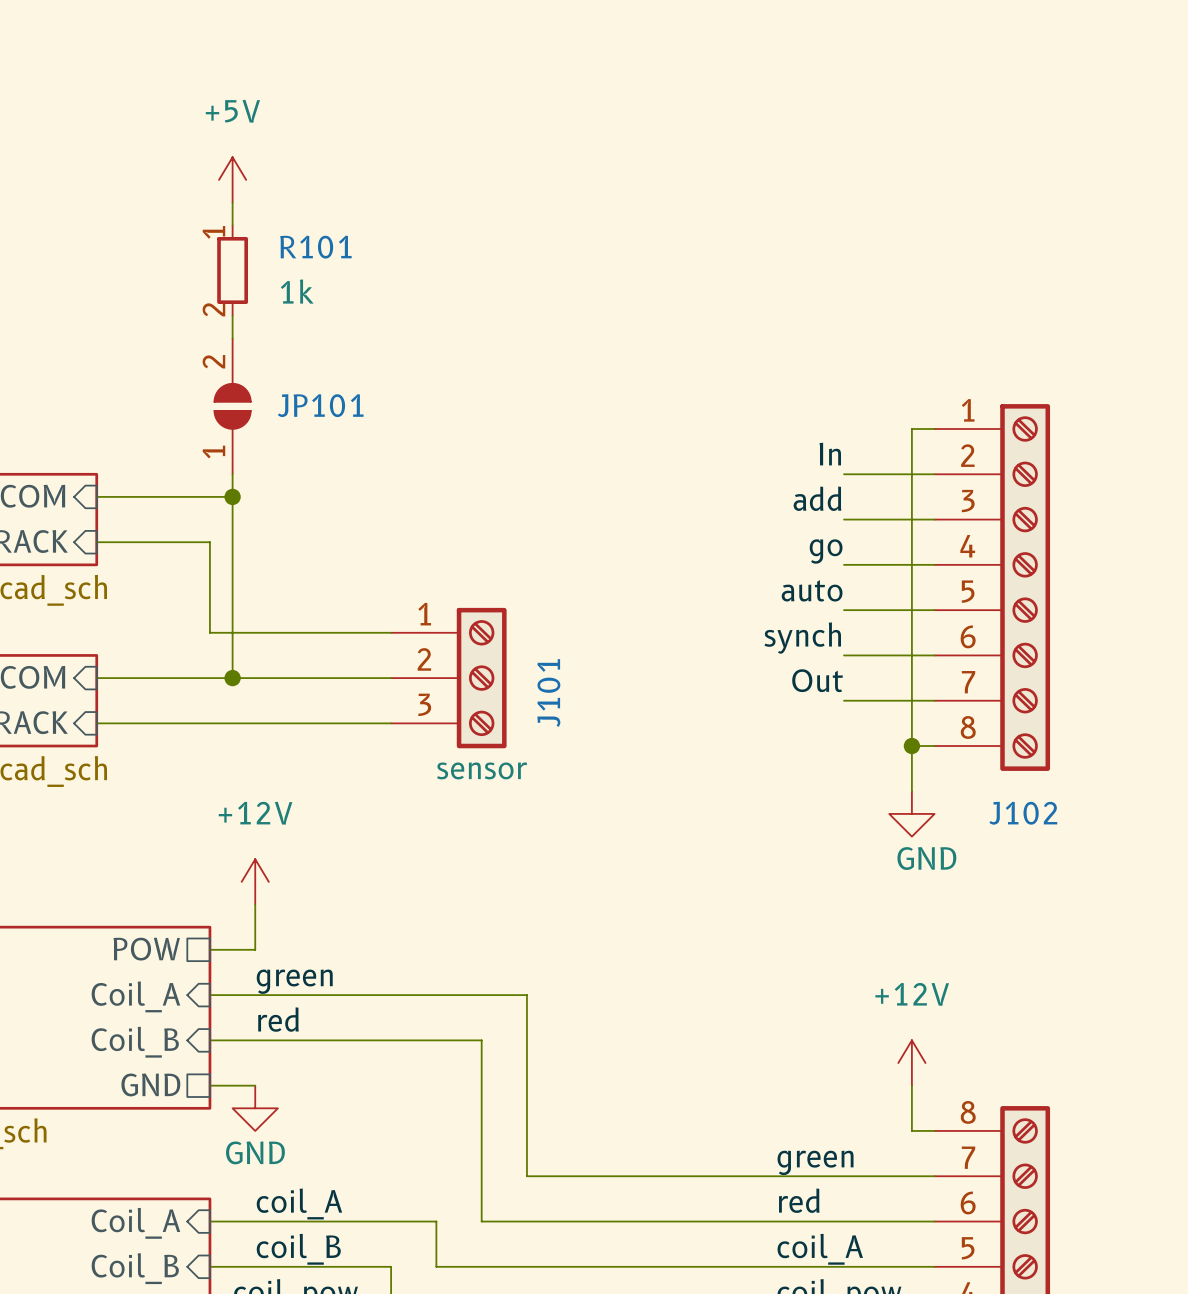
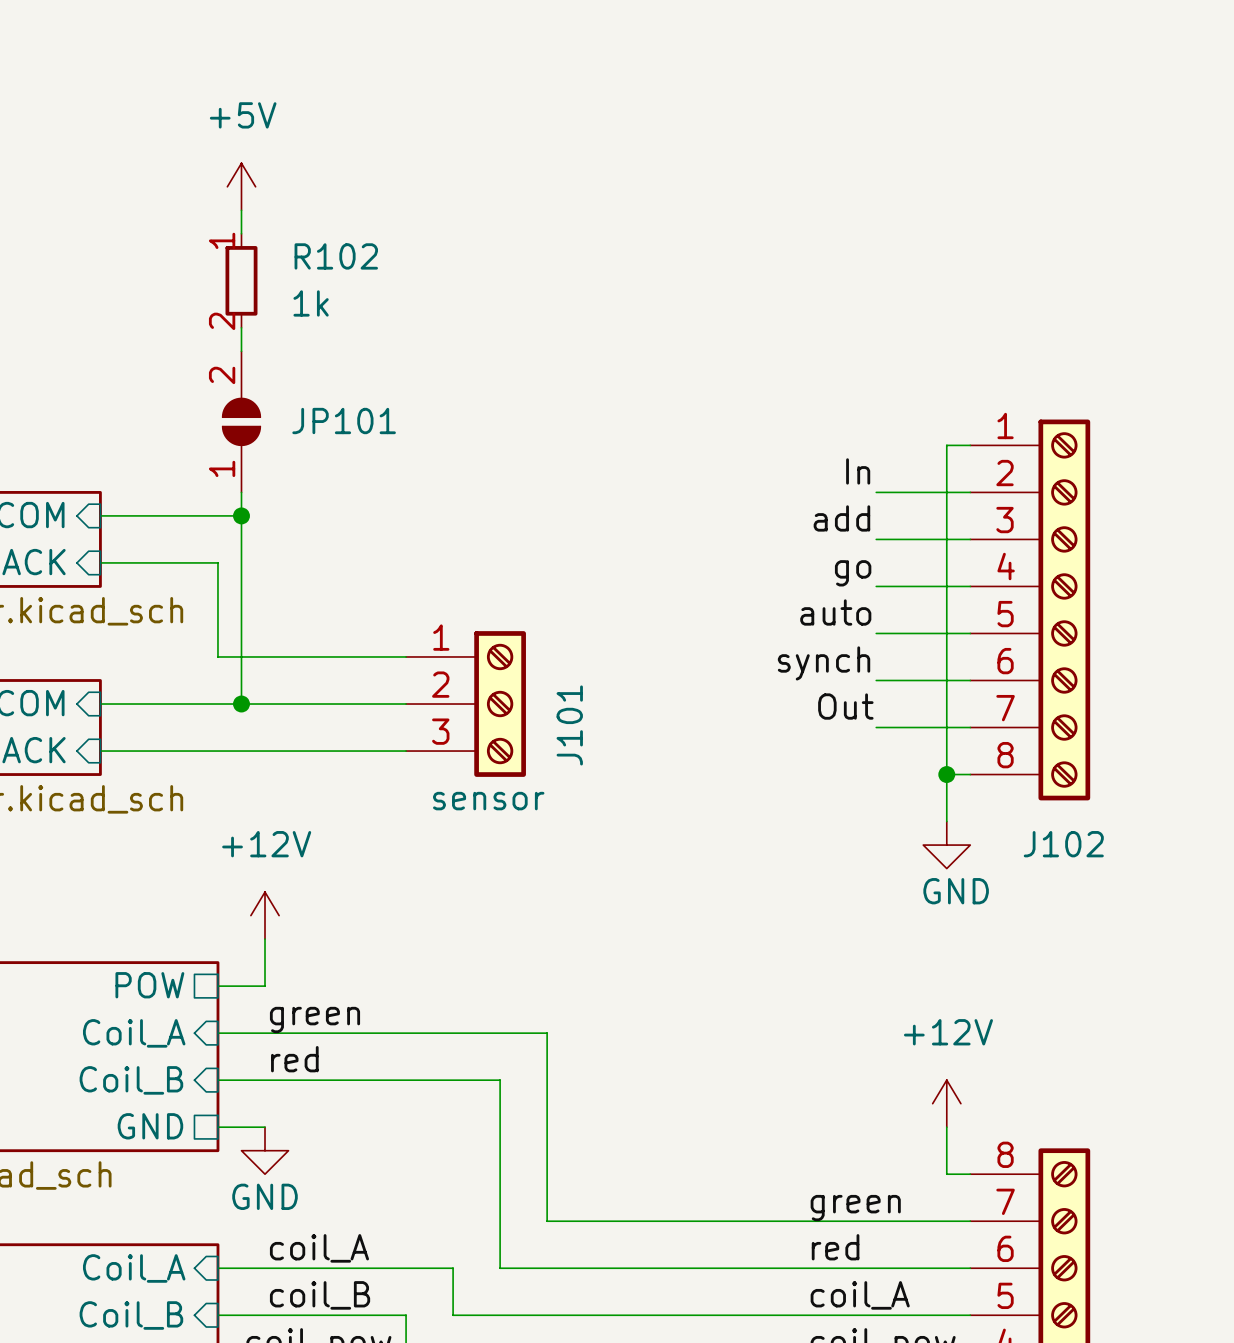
R101 name: R101 (315, 247) -> R102 (336, 256)

